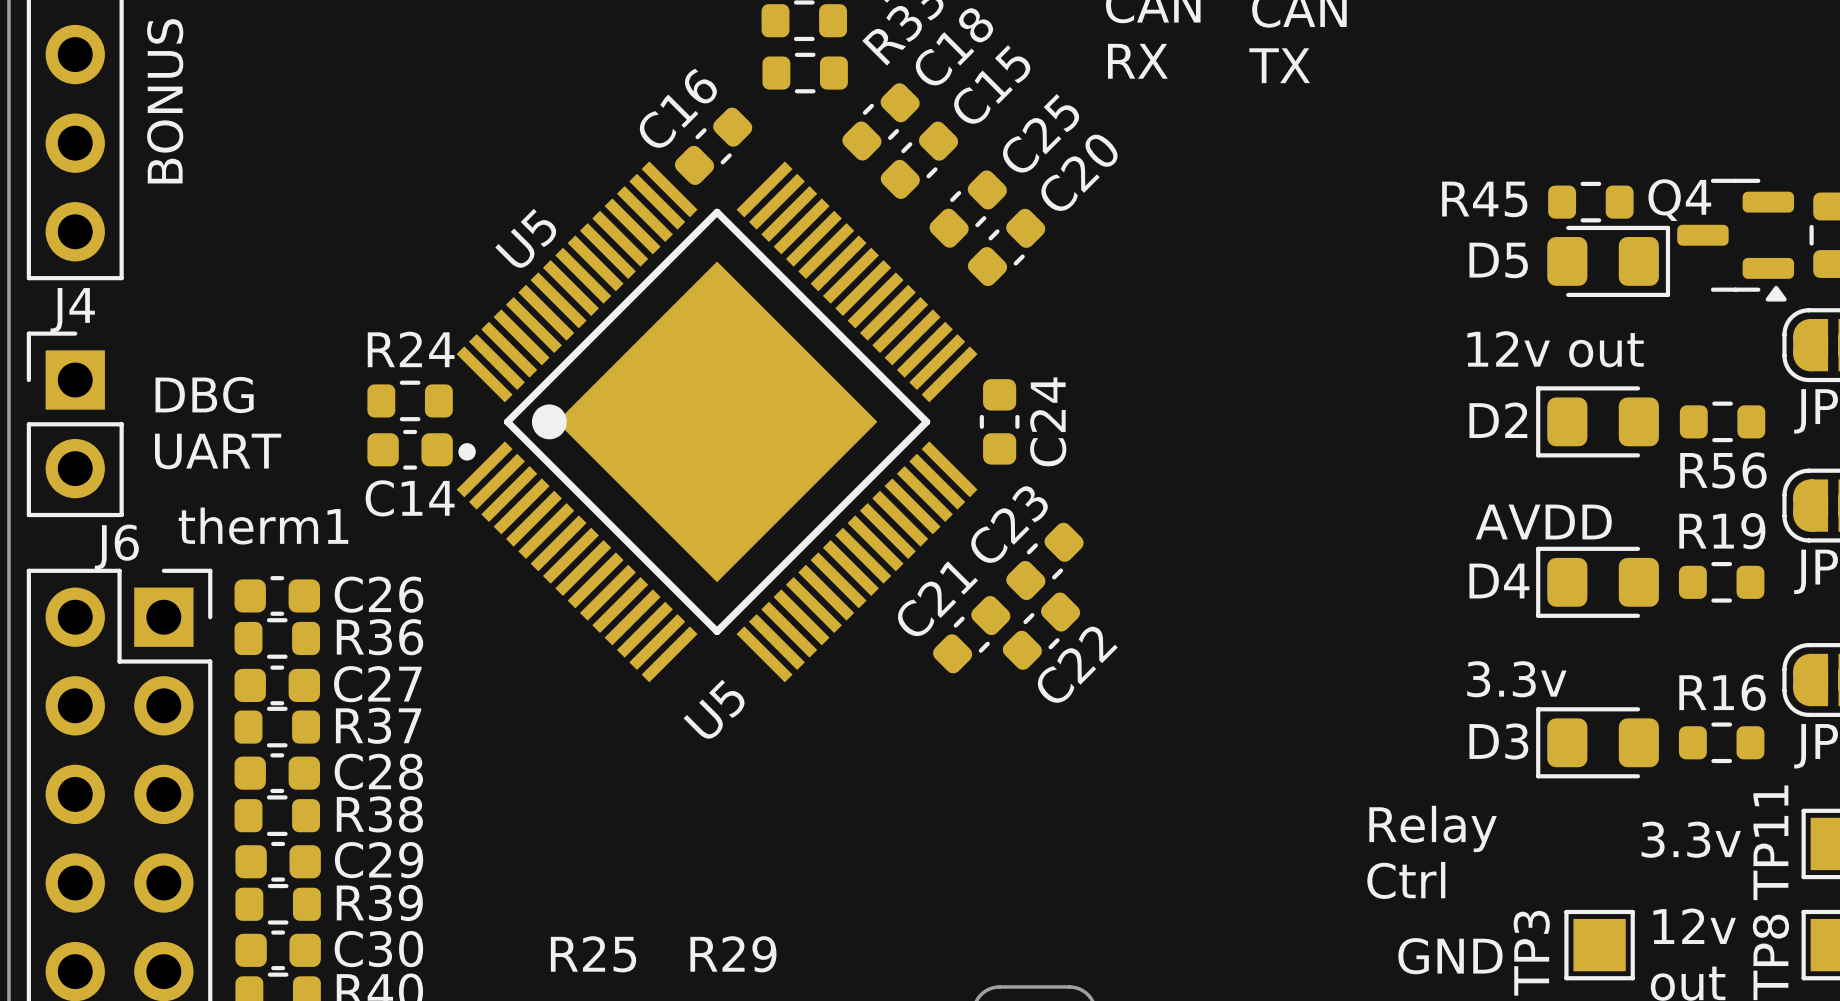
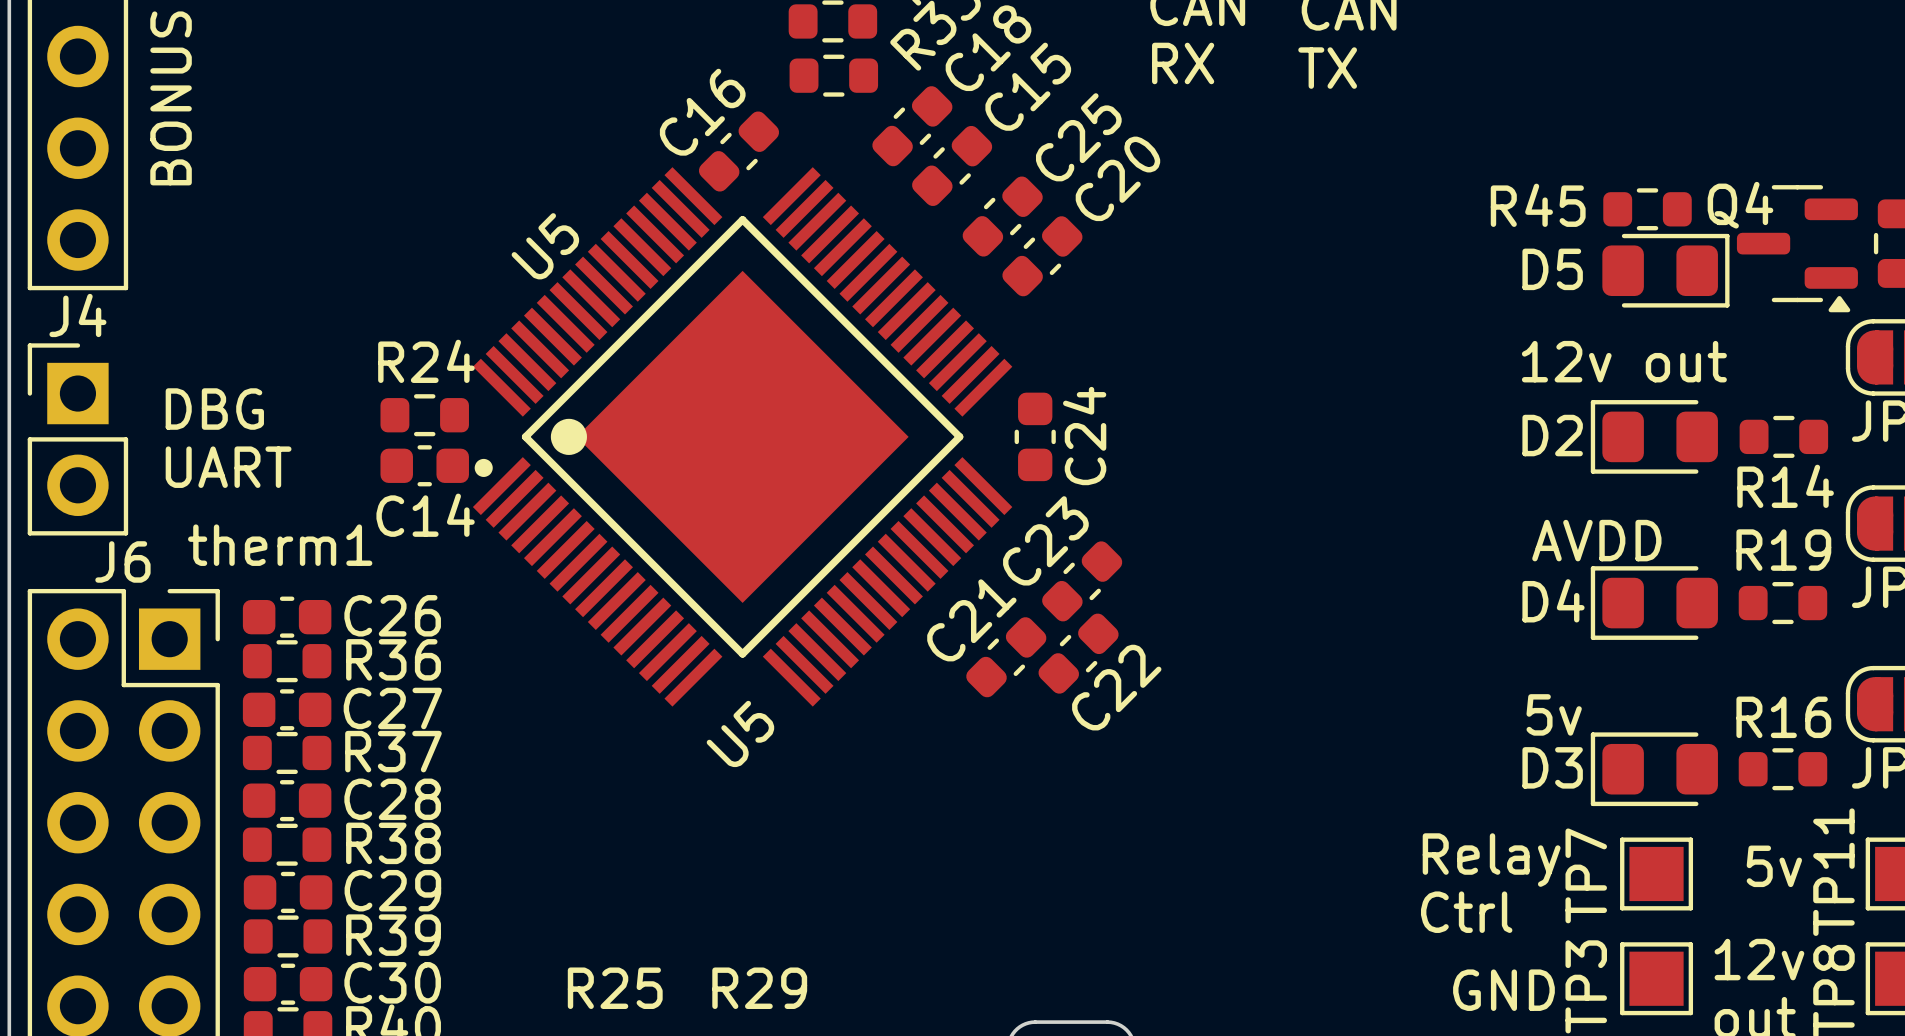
R56 name: R56 (1723, 470) -> R14 (1785, 486)
text: 3.3v (1516, 679) -> 5v (1554, 714)
text: none -> 5v (1774, 866)
text: 3.3v (1691, 839) -> none
TP7: none -> (1656, 873)

